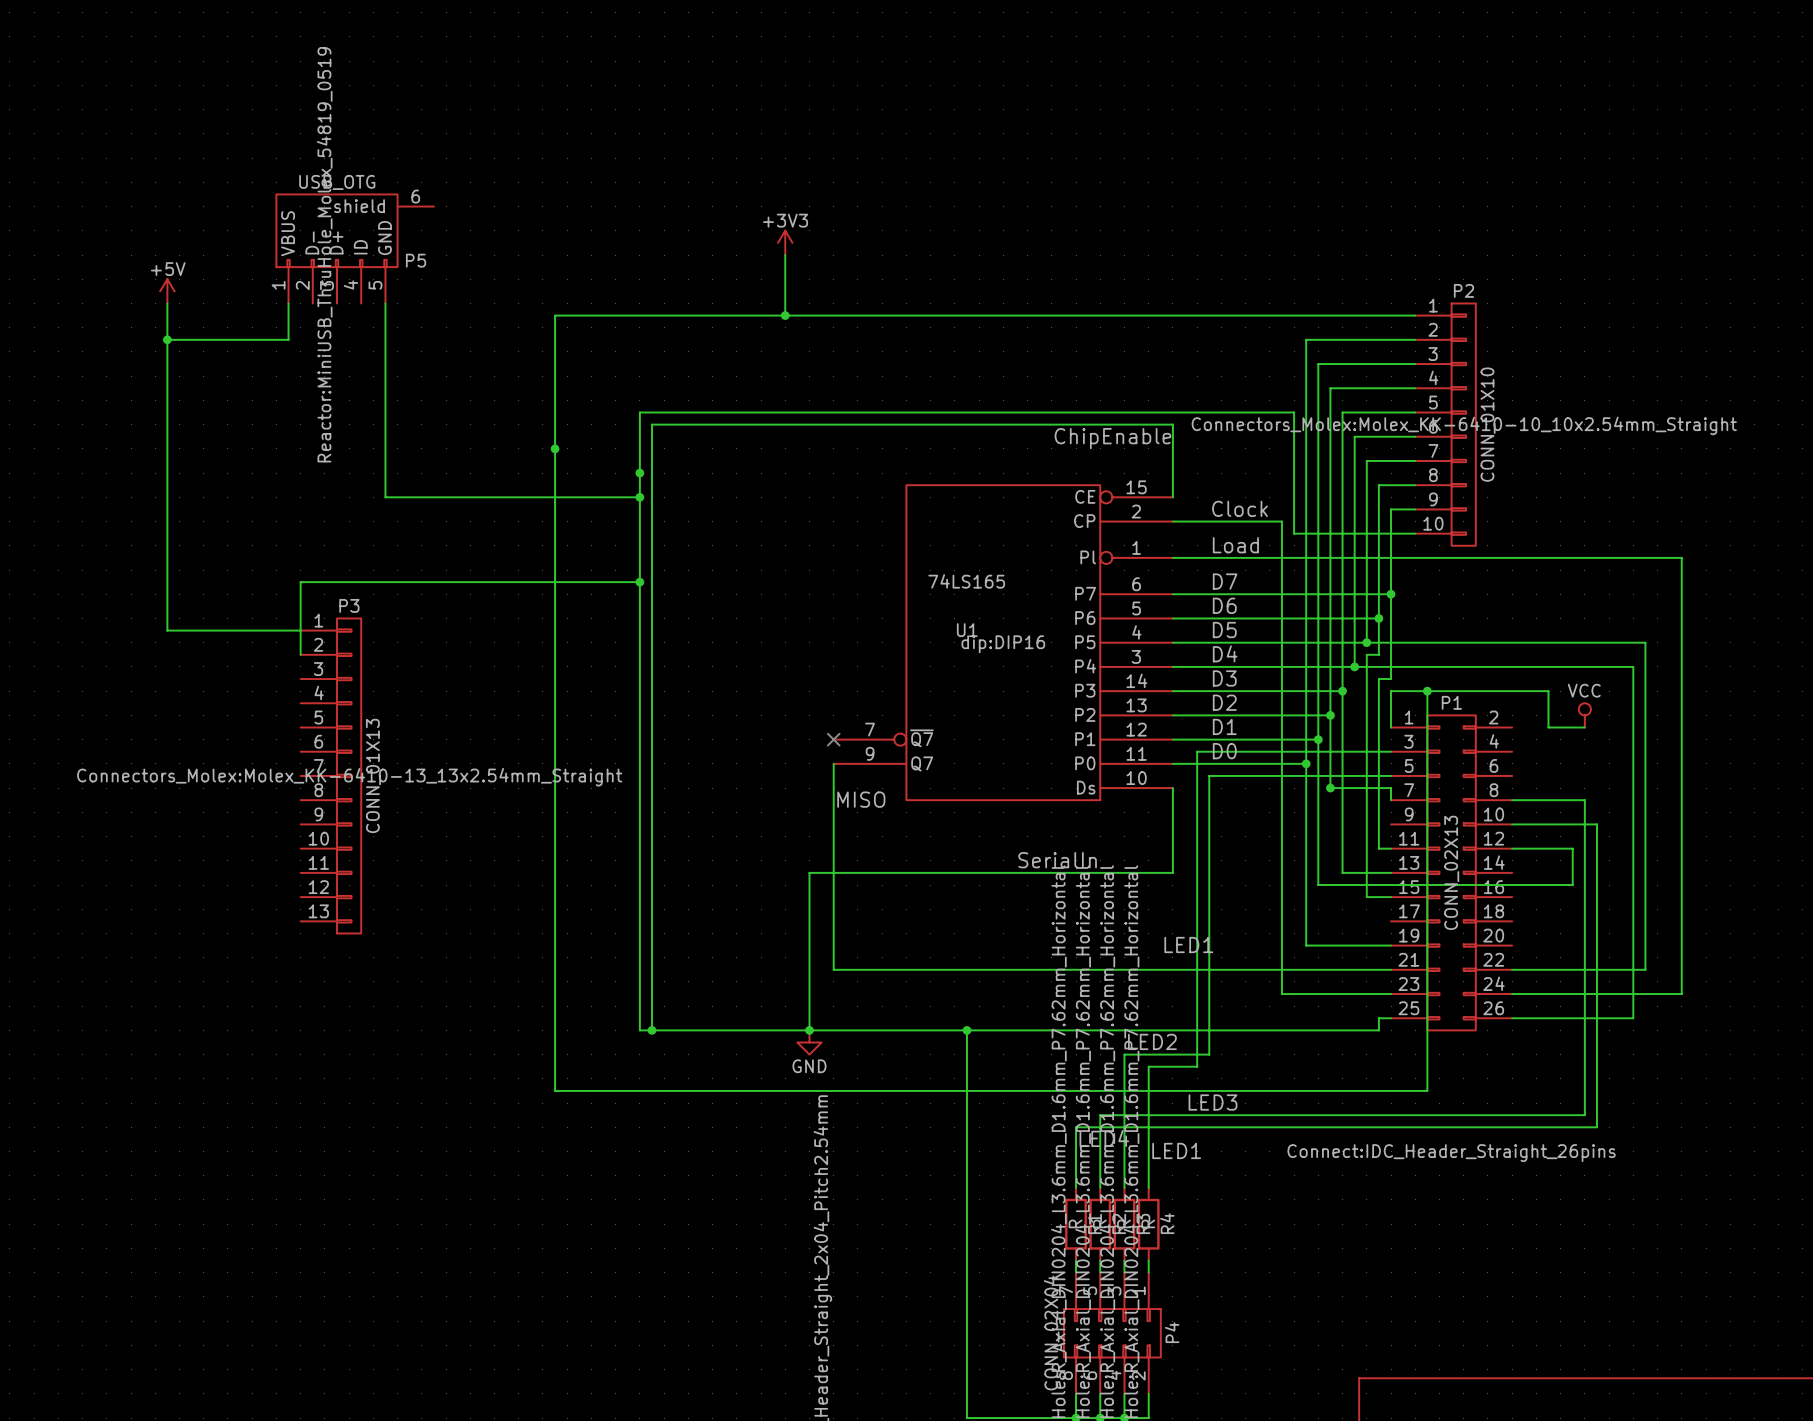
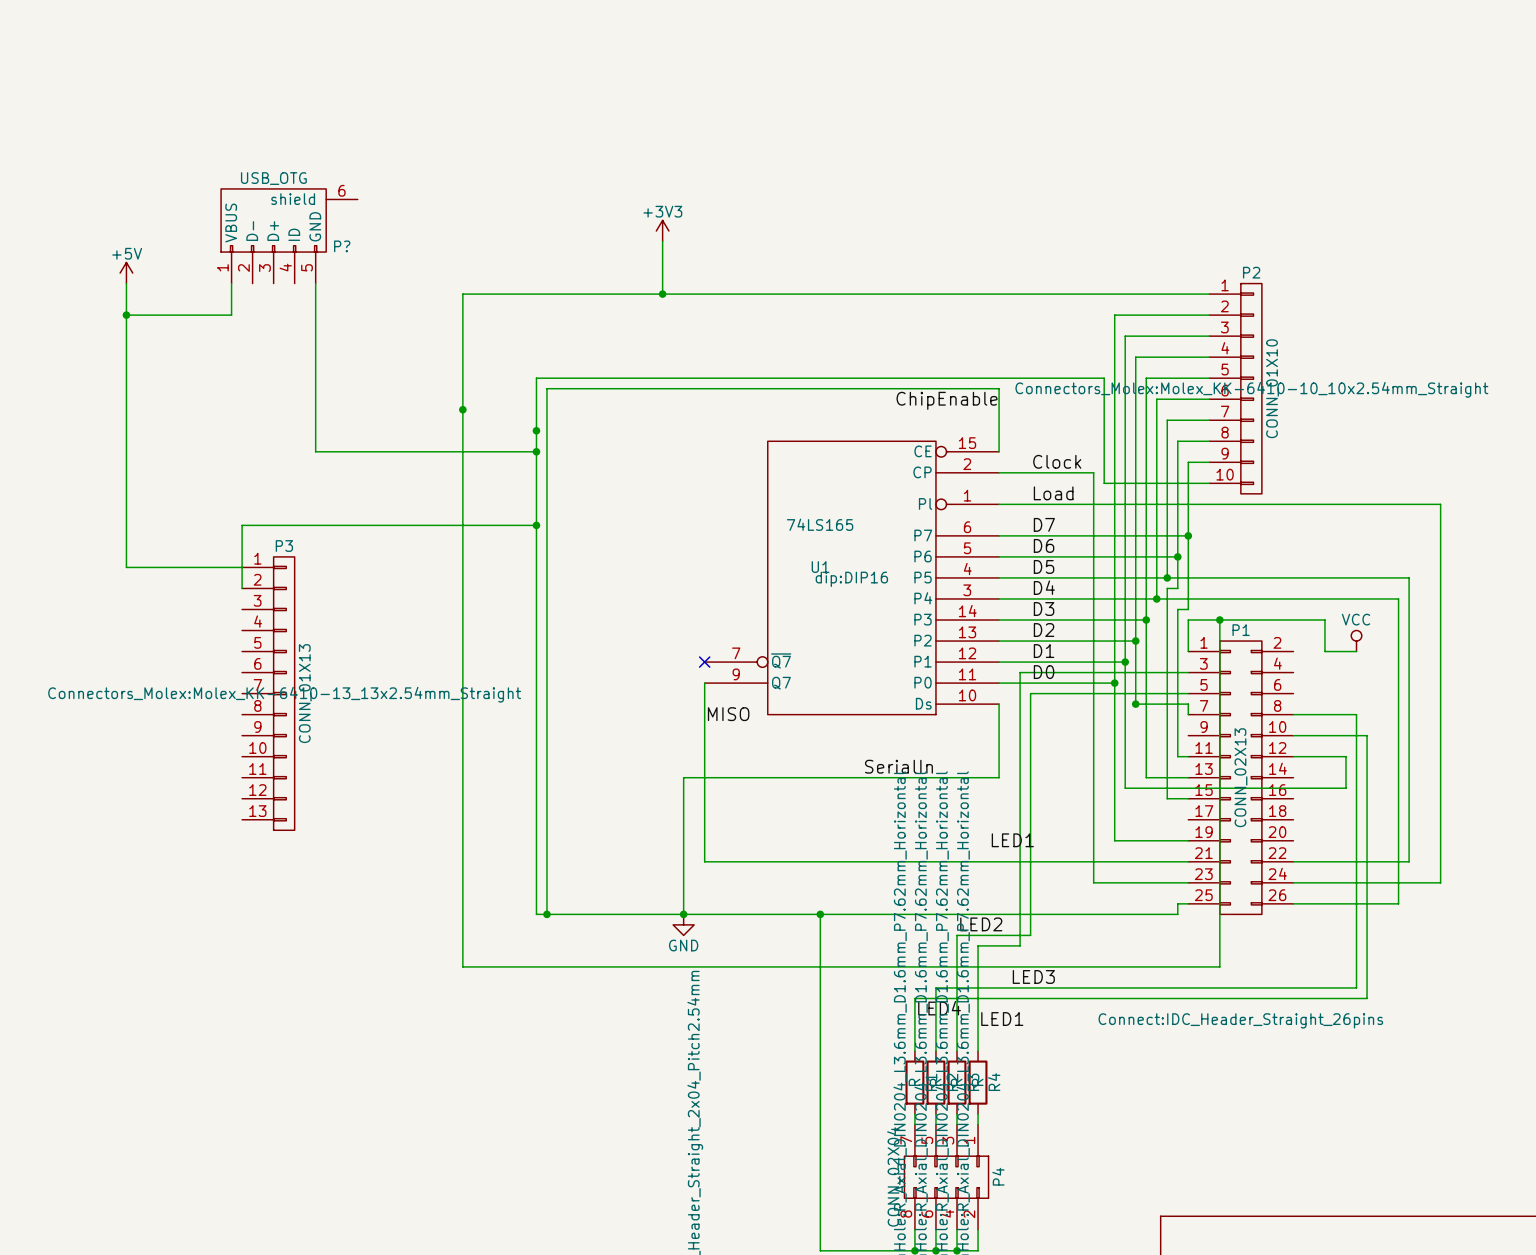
P5 text: Reactor:MiniUSB_ThruHole_Molex_54819_0519 (324, 254) -> none
P5 name: P5 (416, 260) -> P? (342, 246)

